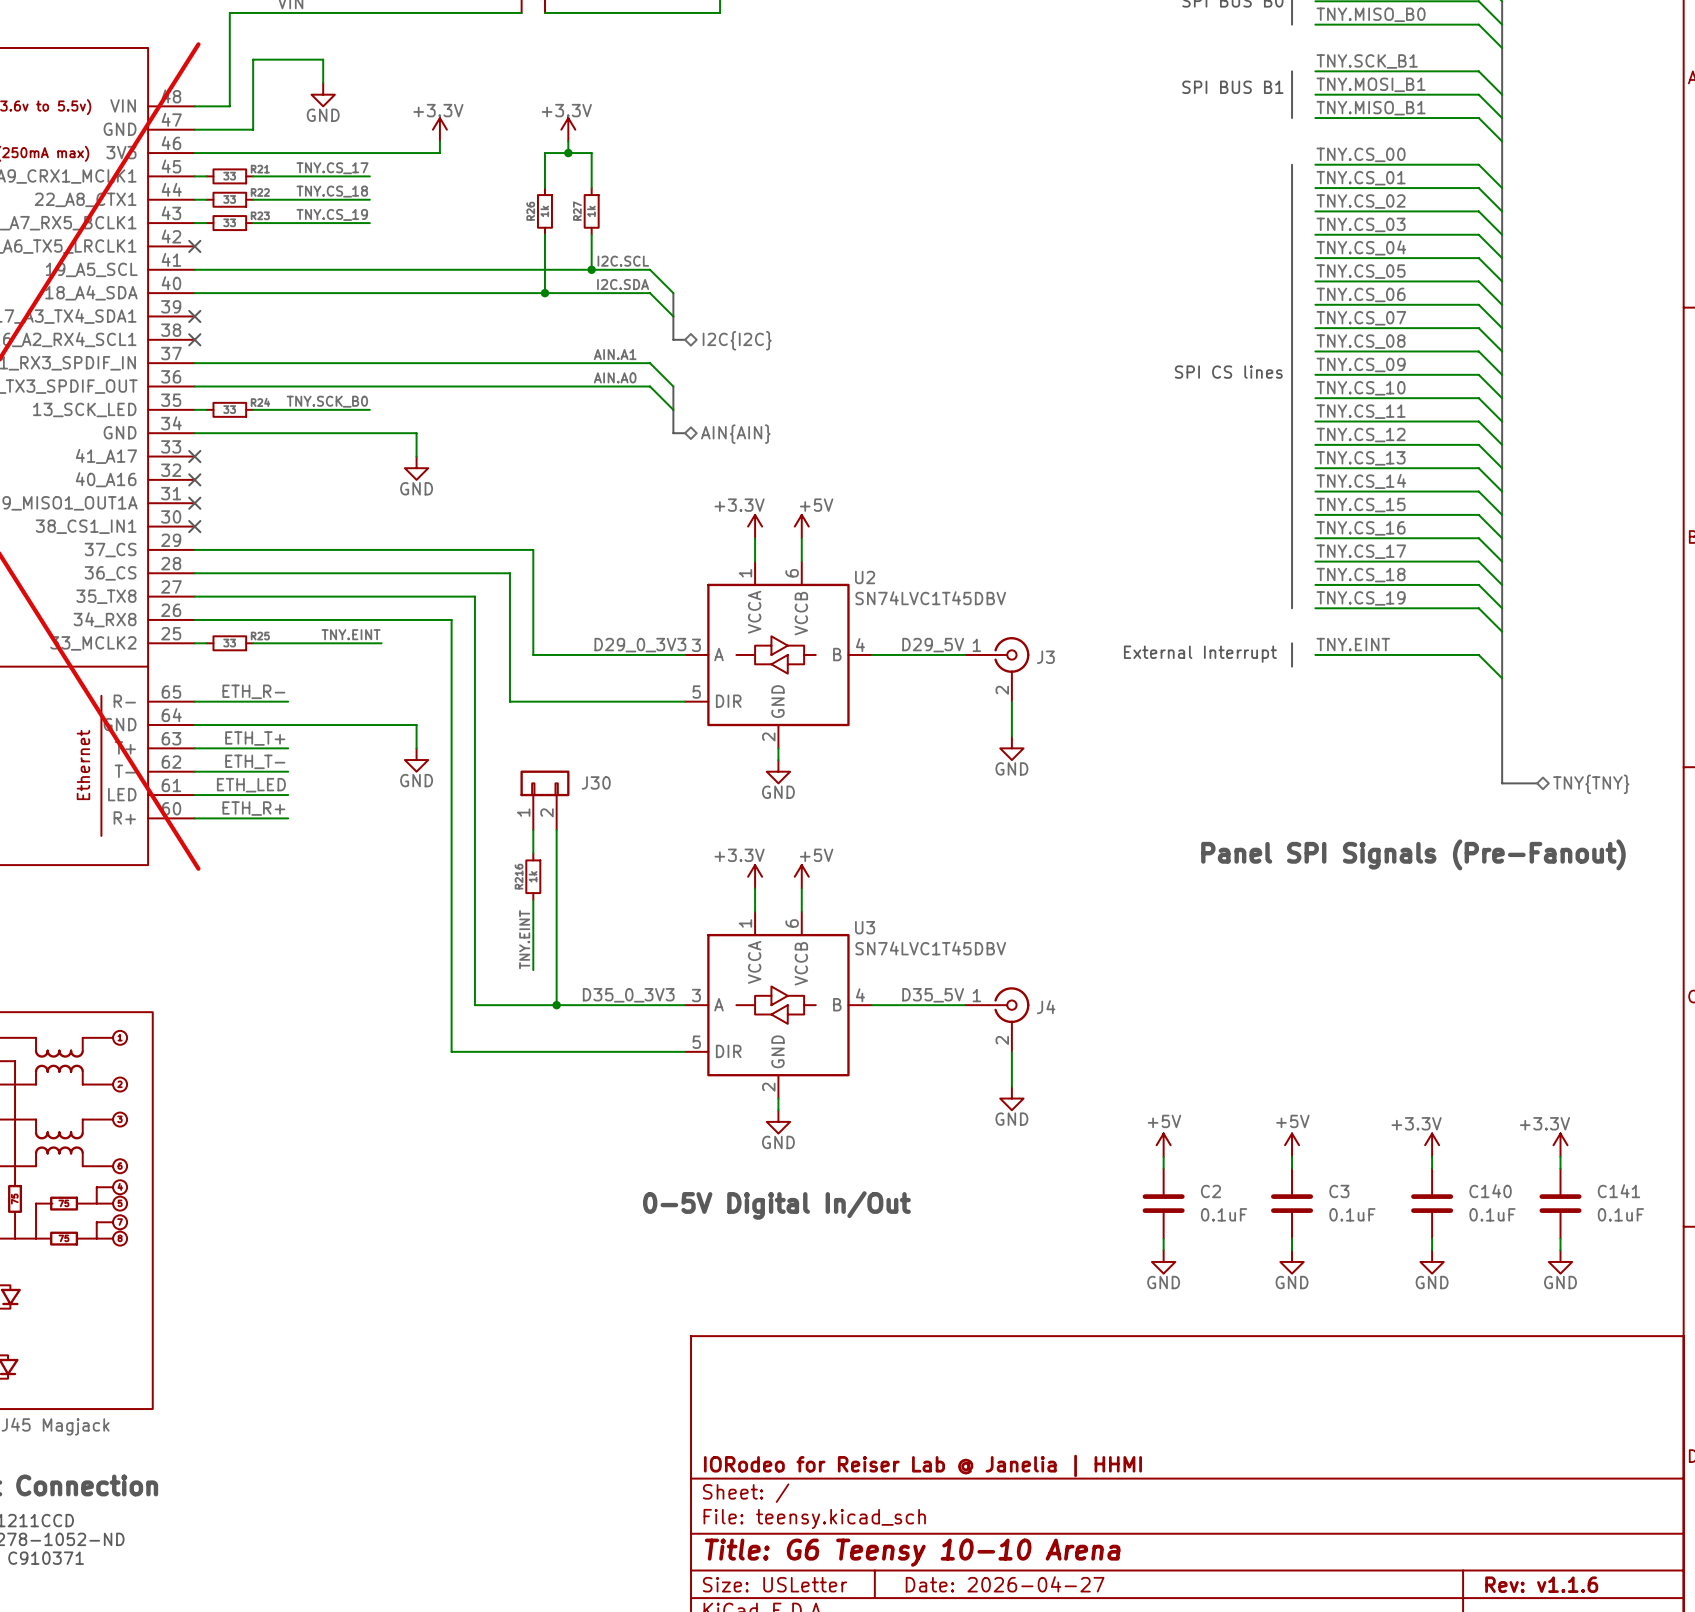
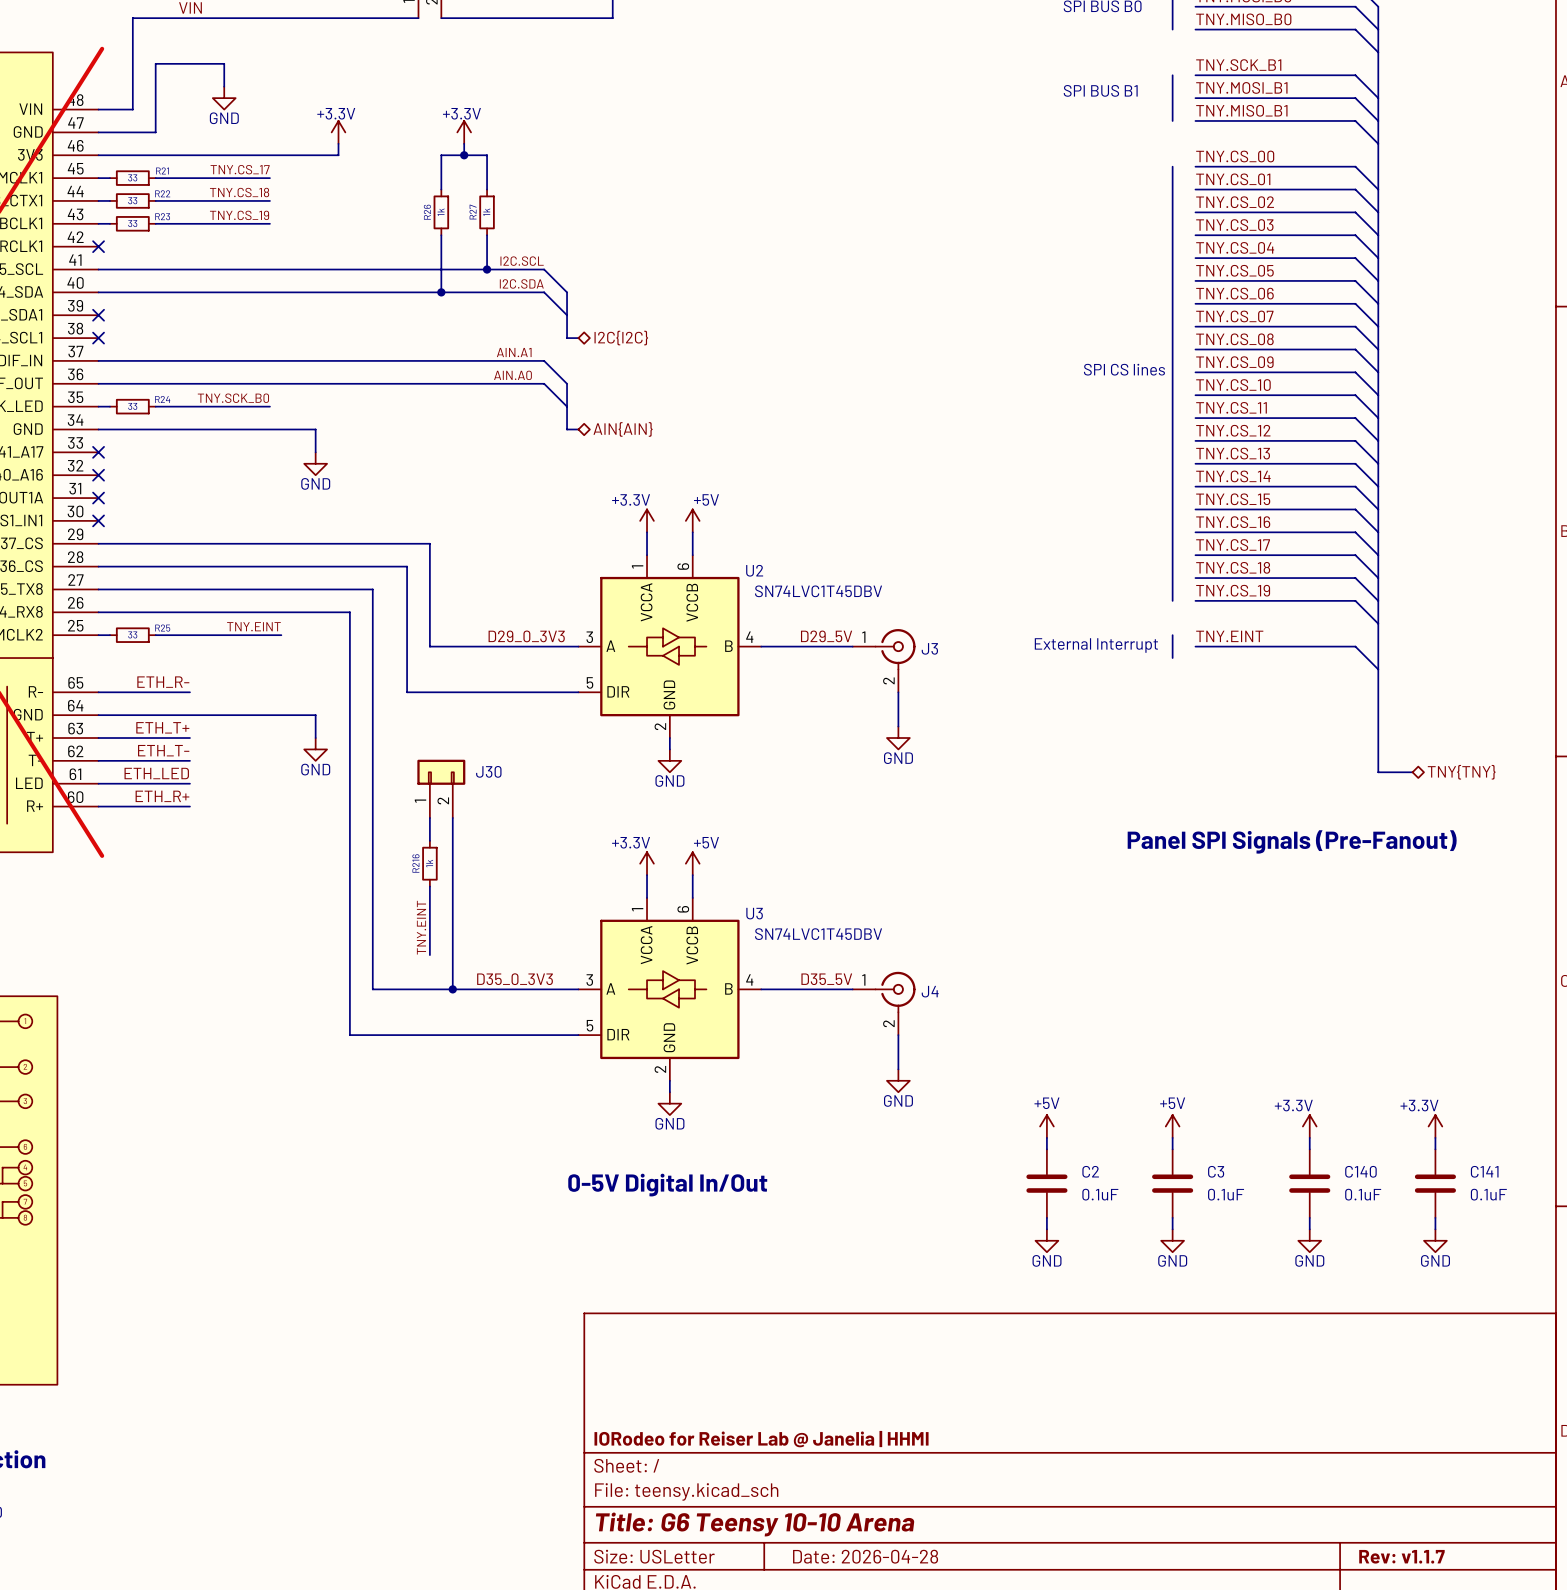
title block: Date: 2026-04-27 (1005, 1584) -> Date: 2026-04-28 (865, 1556)
title block: Rev: v1.1.6 (1541, 1584) -> Rev: v1.1.7 (1401, 1556)

